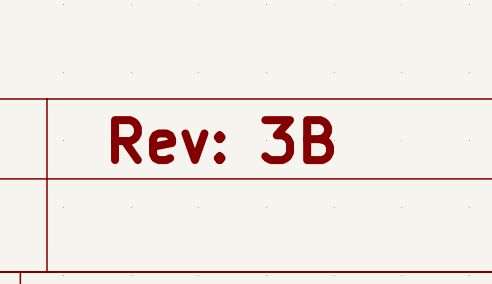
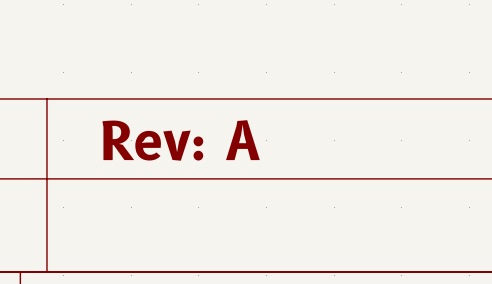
title block: Rev: 3B (222, 140) -> Rev: A (181, 140)

